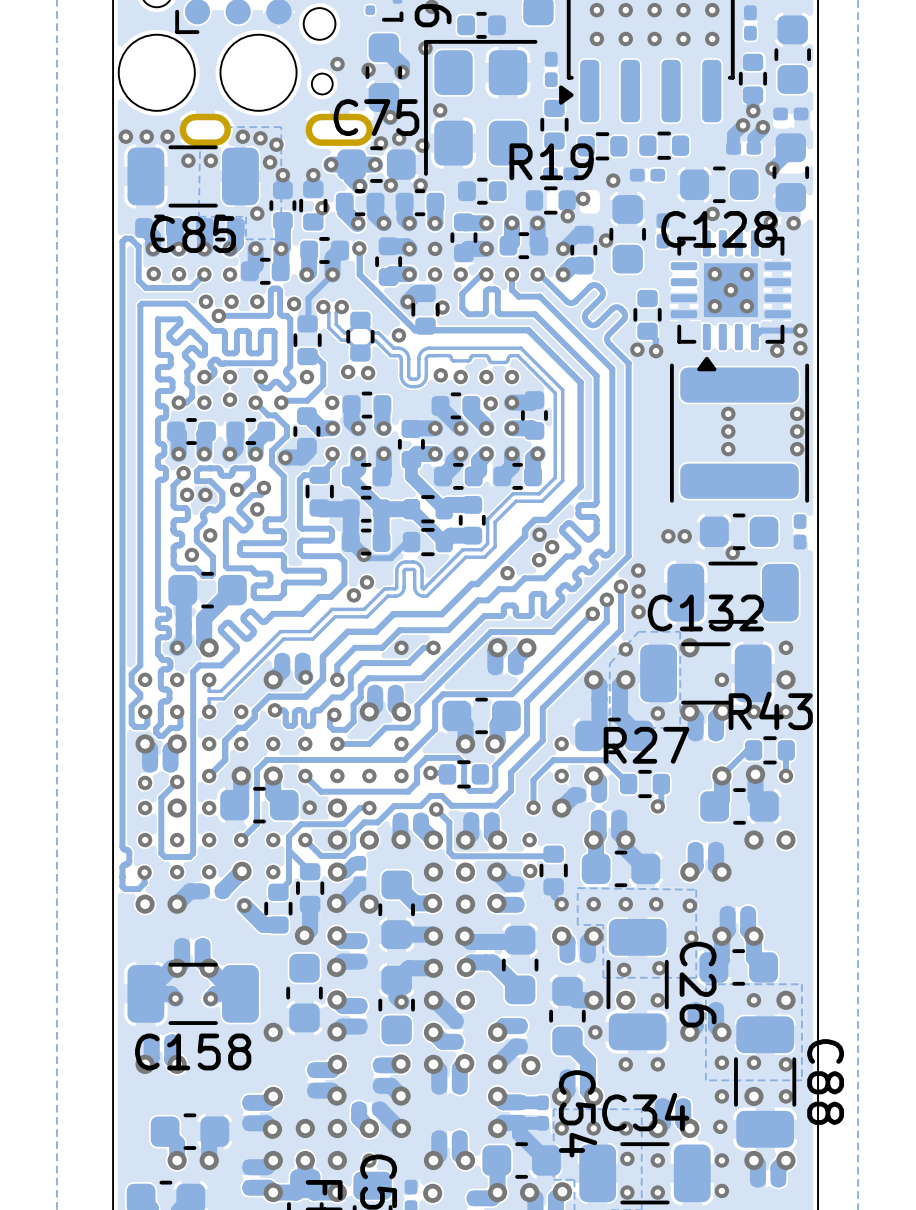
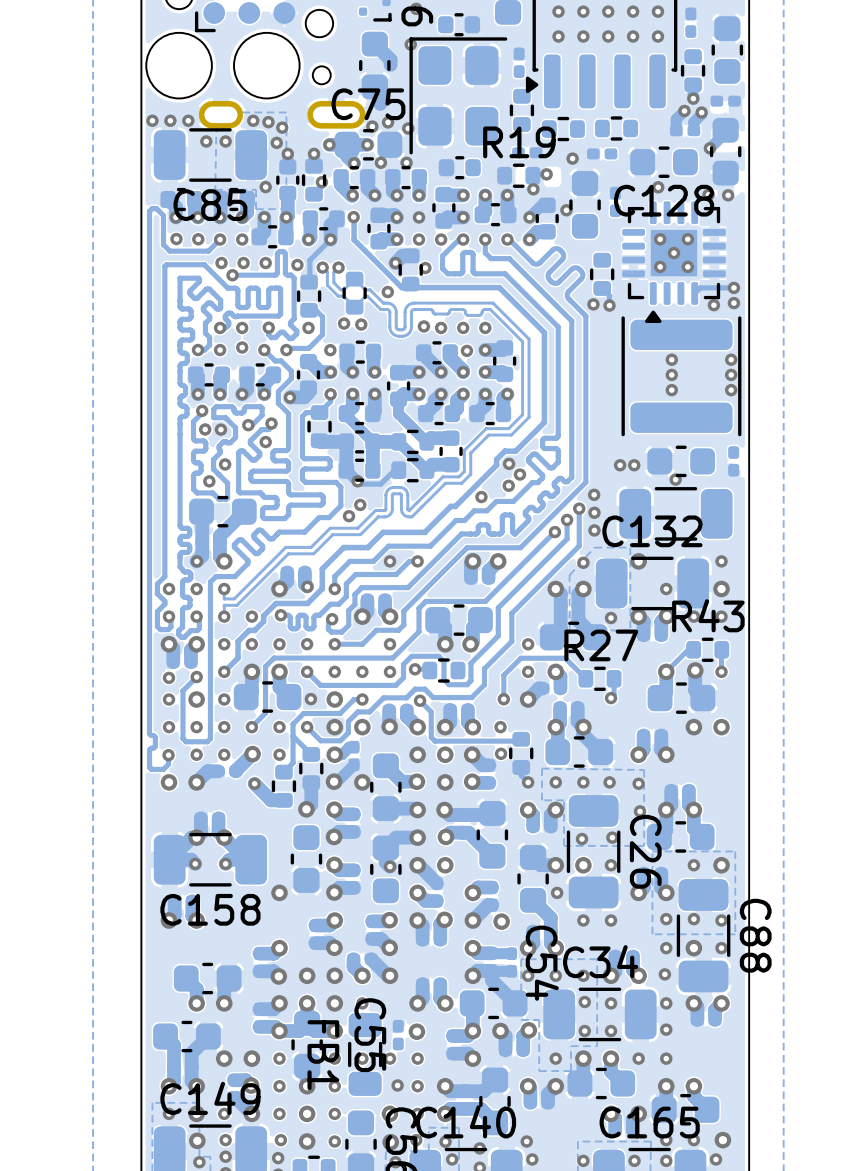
via: (337, 64) -> none
via: (368, 69) -> none
via: (402, 71) -> none
via: (440, 110) -> none
via: (390, 117) -> none

